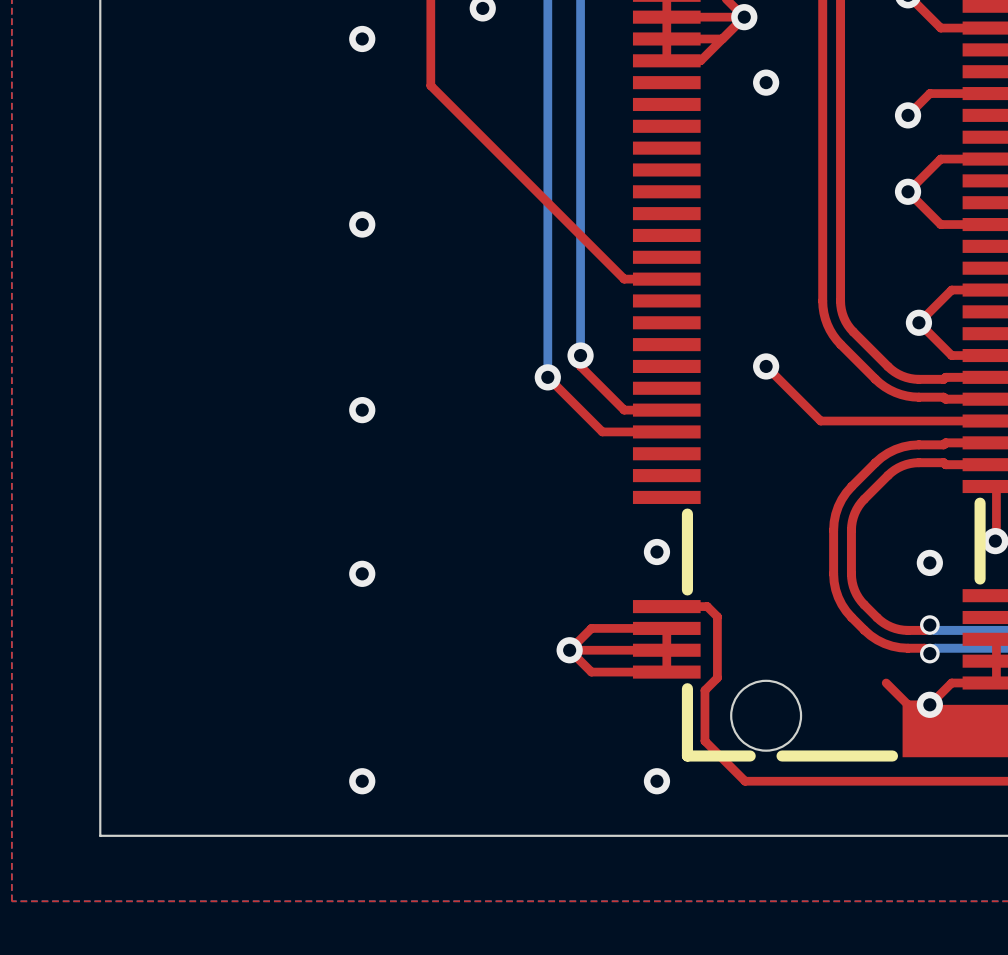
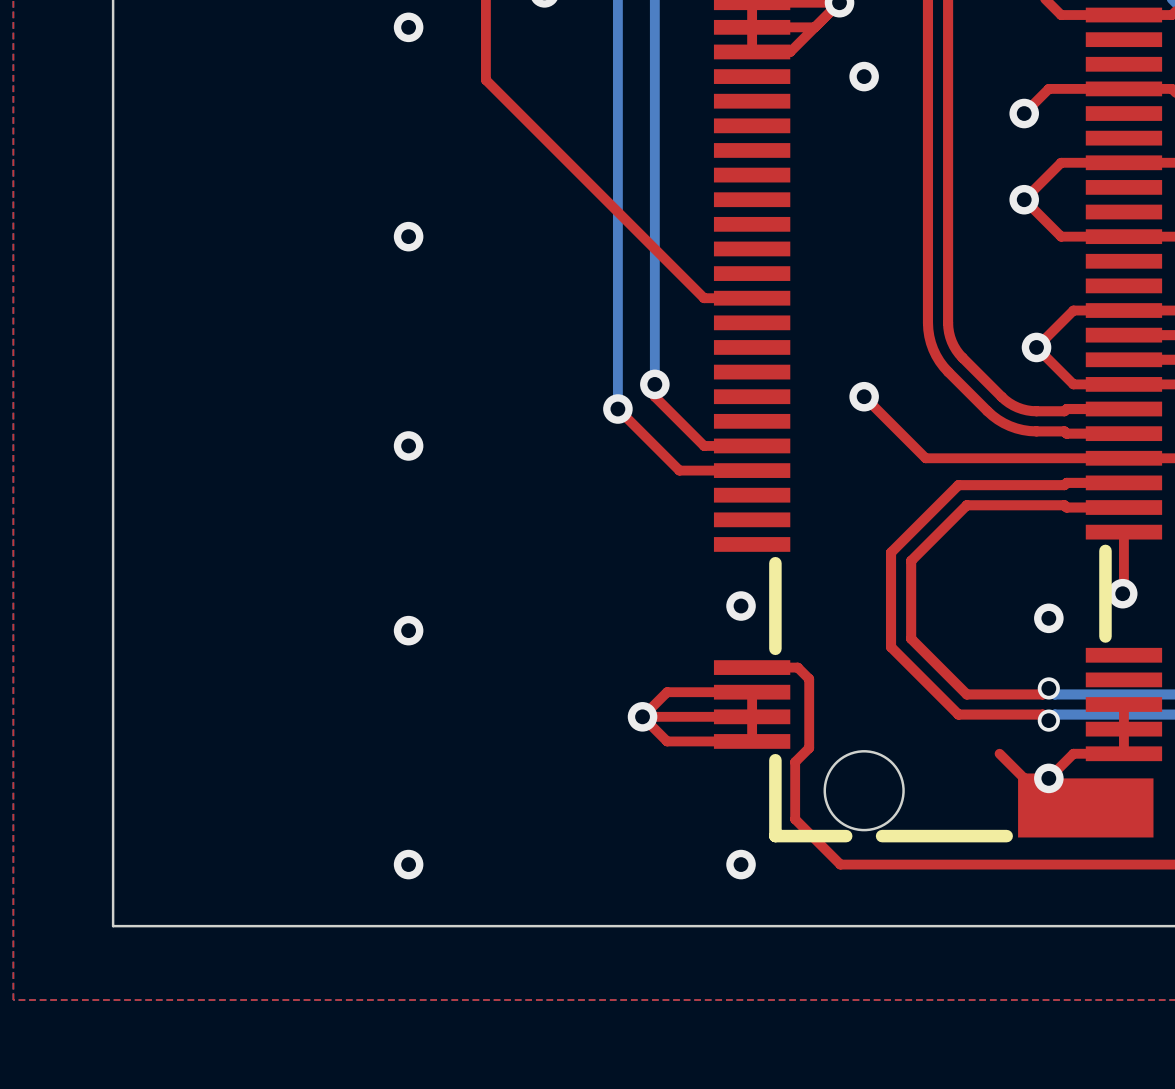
top track: (918, 444) (895, 449) (875, 462) (841, 499) (835, 514) (833, 530) (834, 581) (841, 604) (851, 617) (877, 640) (892, 646) (907, 648) -> (1036, 485) (958, 485) (891, 552) (891, 647) (958, 714) (1024, 714)
top track: (918, 462) (902, 466) (888, 475) (858, 505) (851, 525) (851, 578) (856, 594) (864, 604) (883, 623) (895, 628) (907, 630) -> (1036, 505) (966, 505) (911, 560) (911, 638) (966, 694) (1024, 694)

